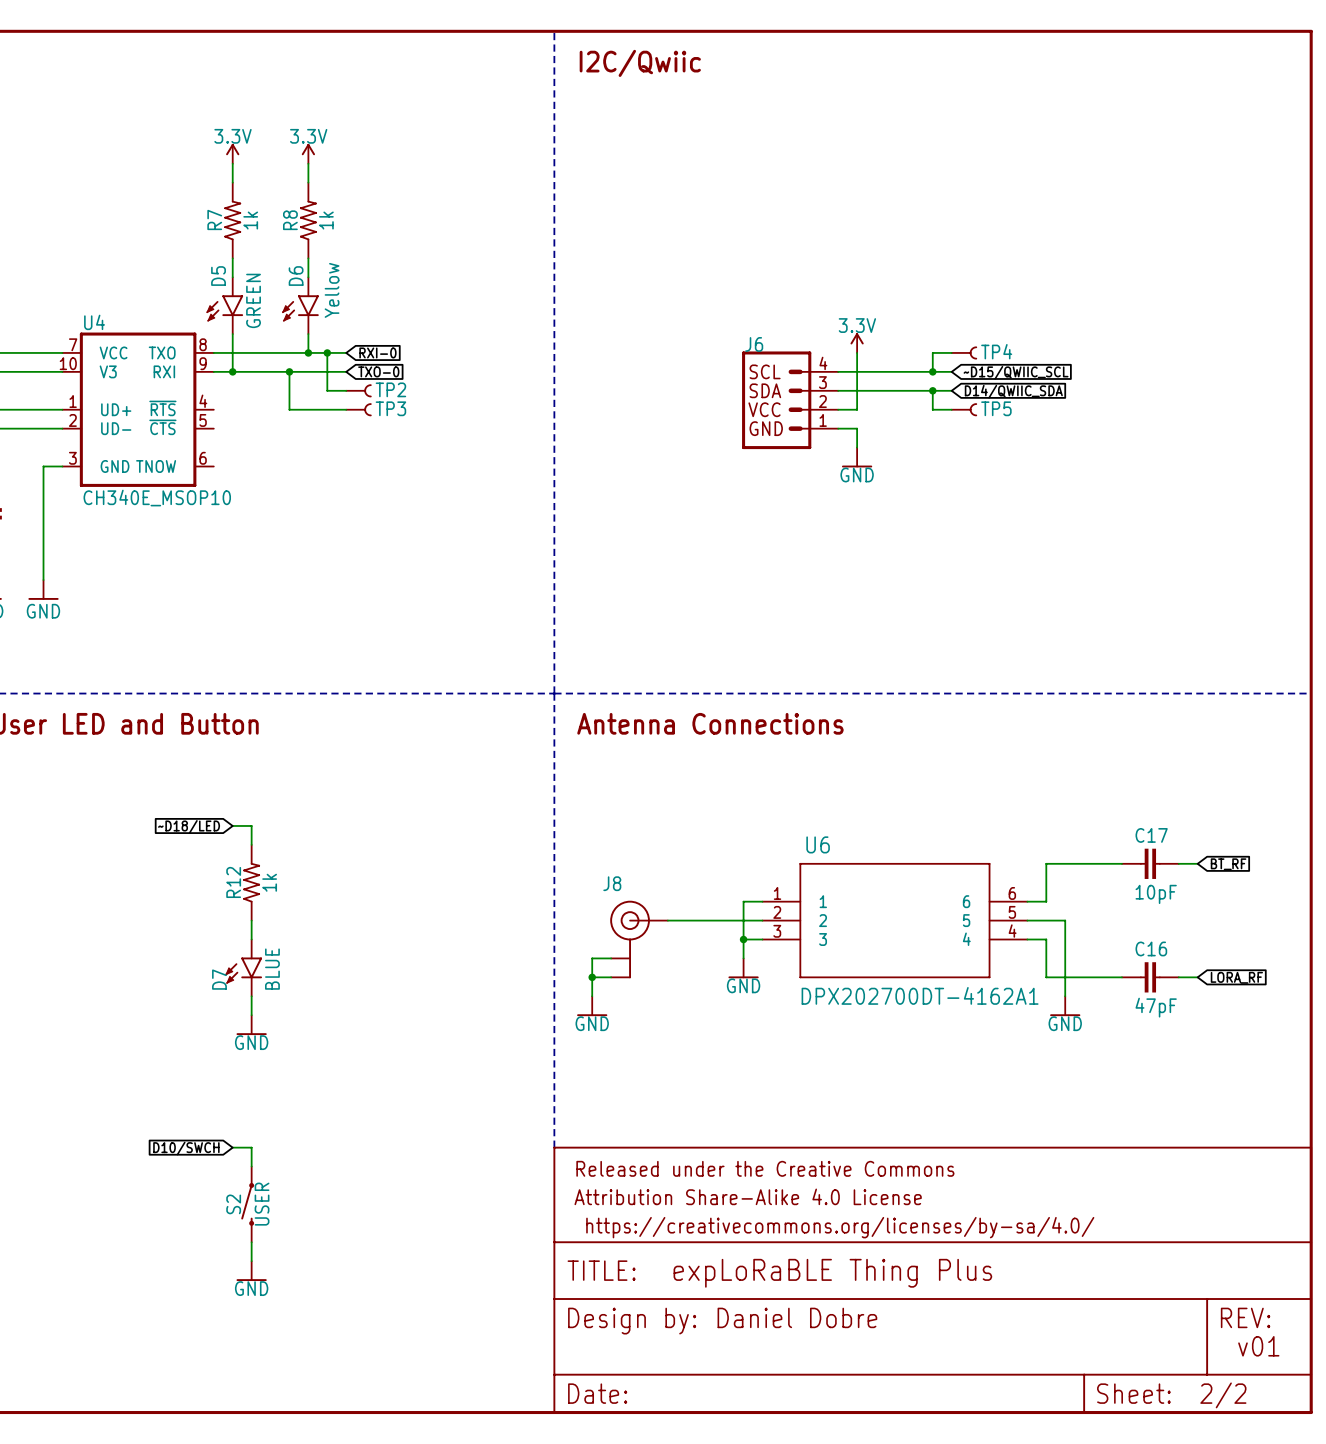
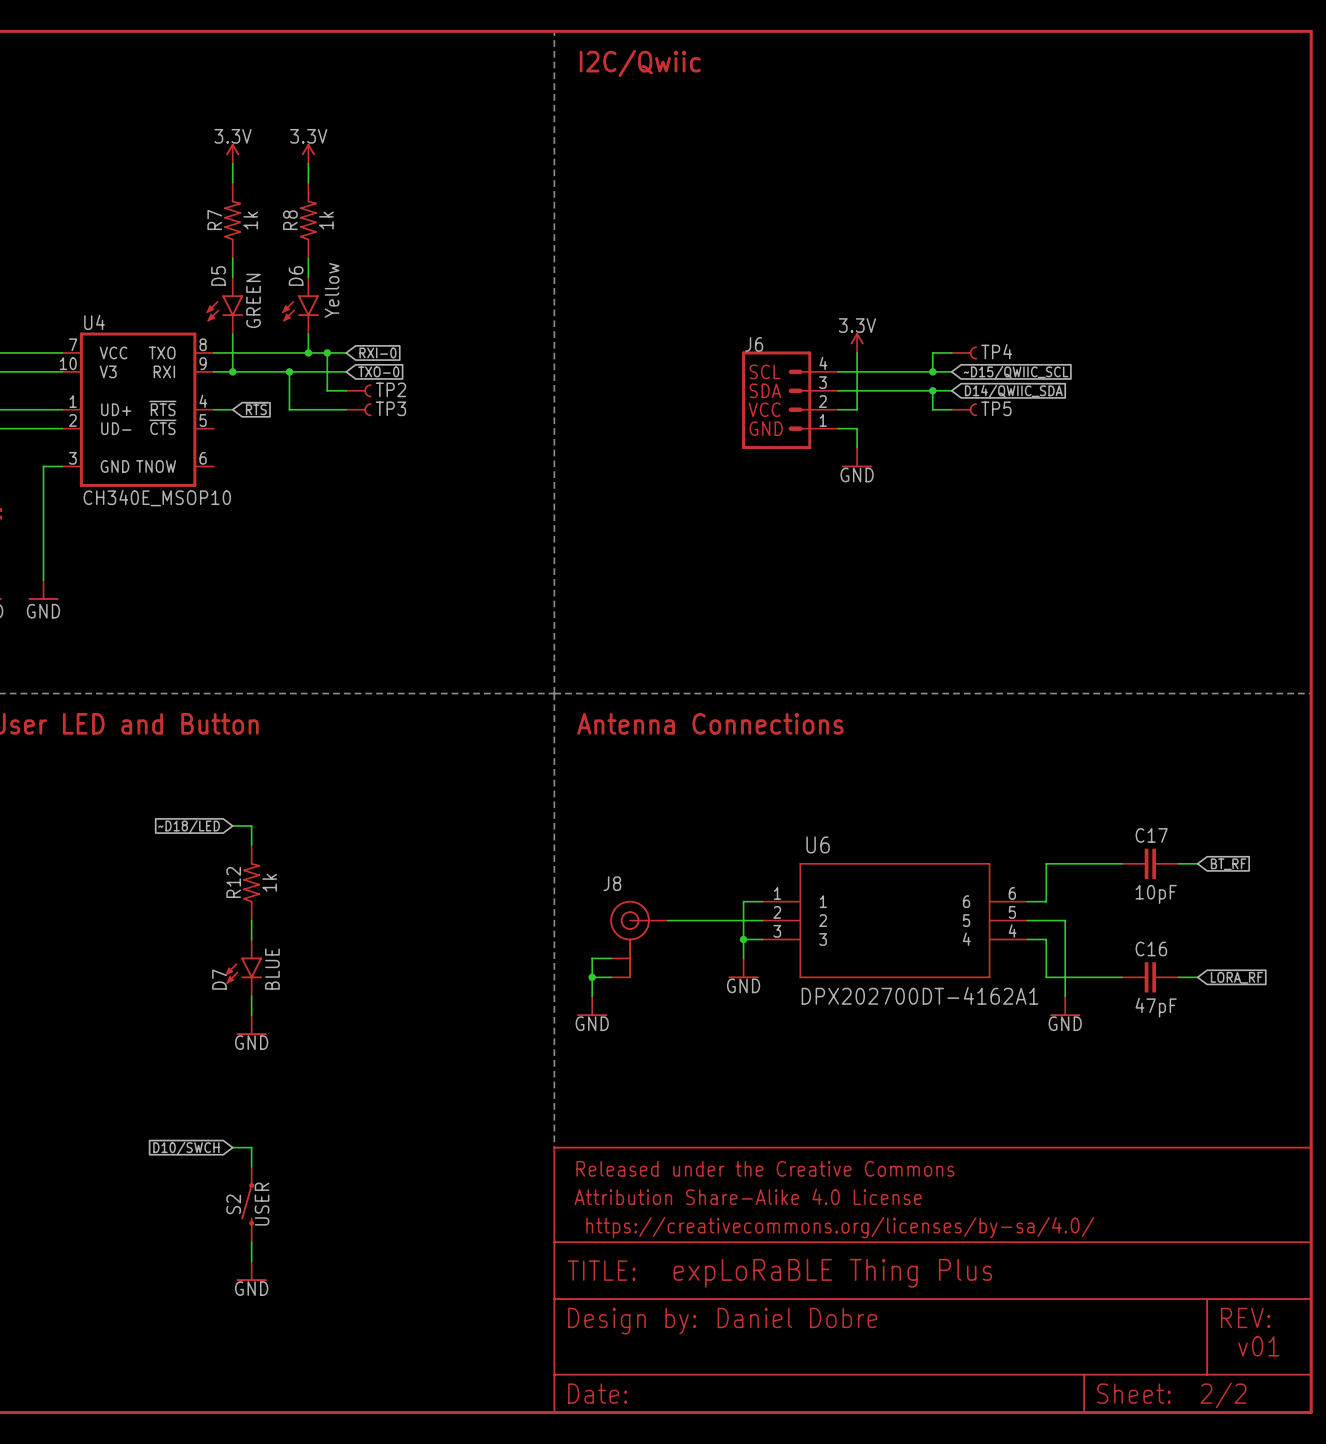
global label: none -> ~{RTS} (256, 408)
wire: none -> (213, 409) (232, 409)

